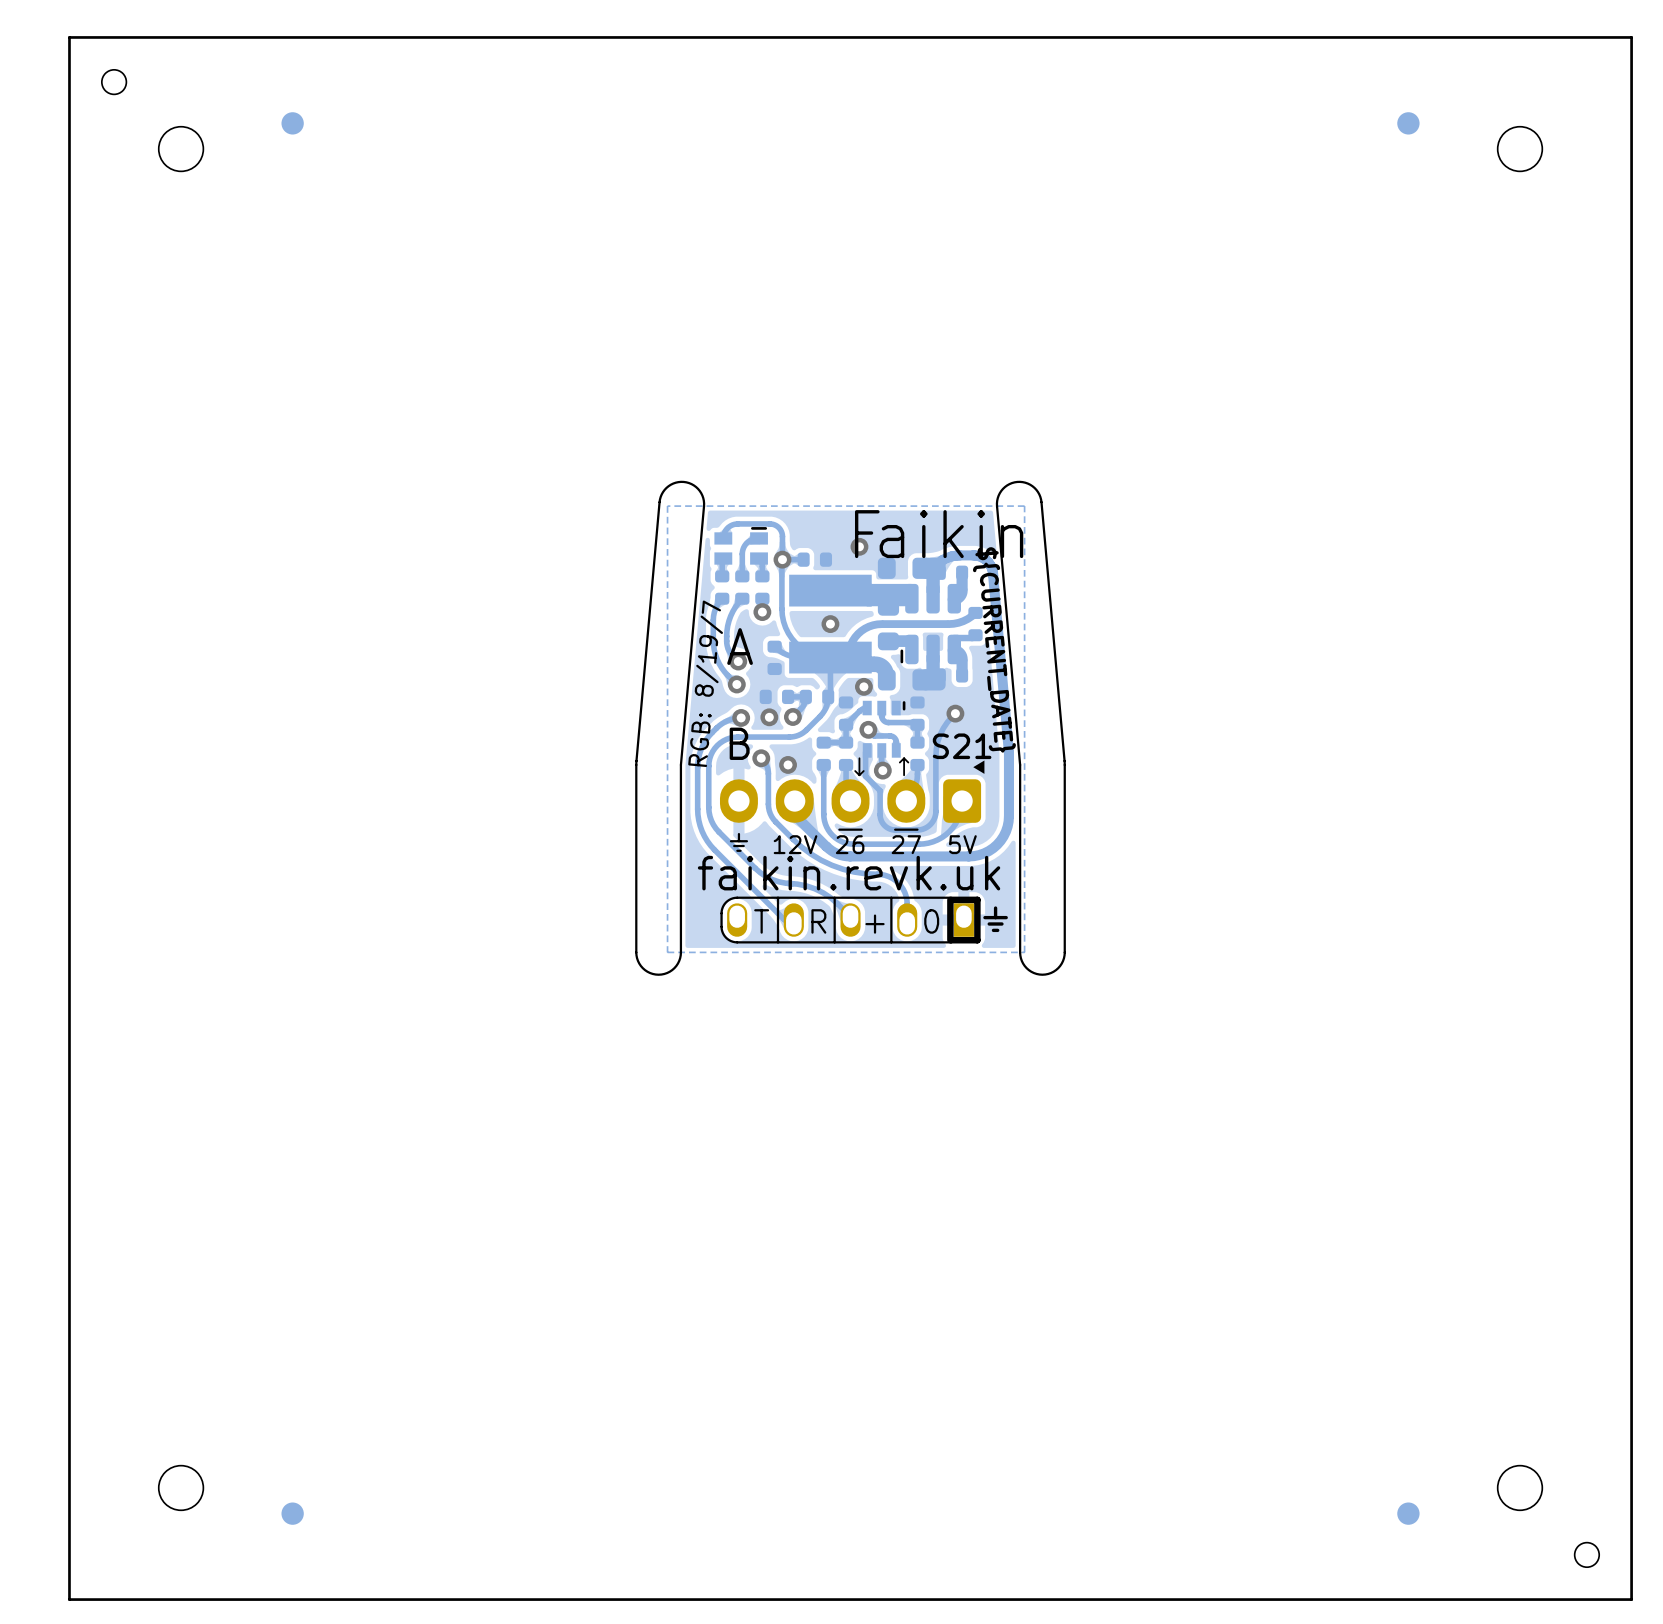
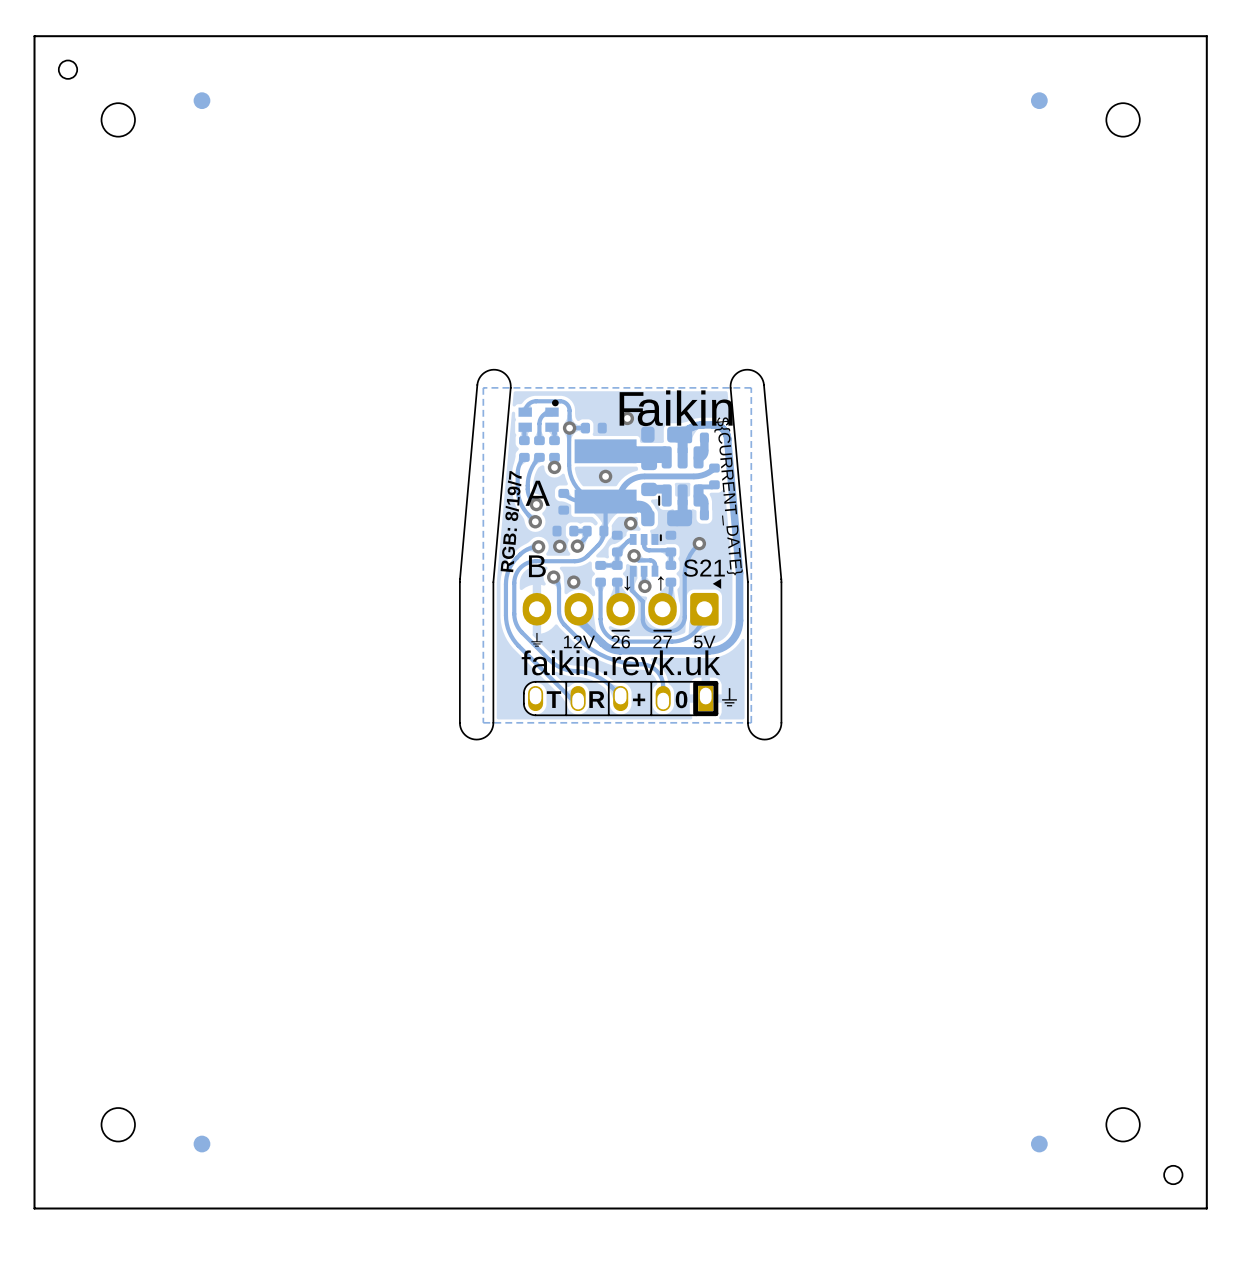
part footprint: [714, 527, 768, 565] -> [518, 399, 559, 432]

